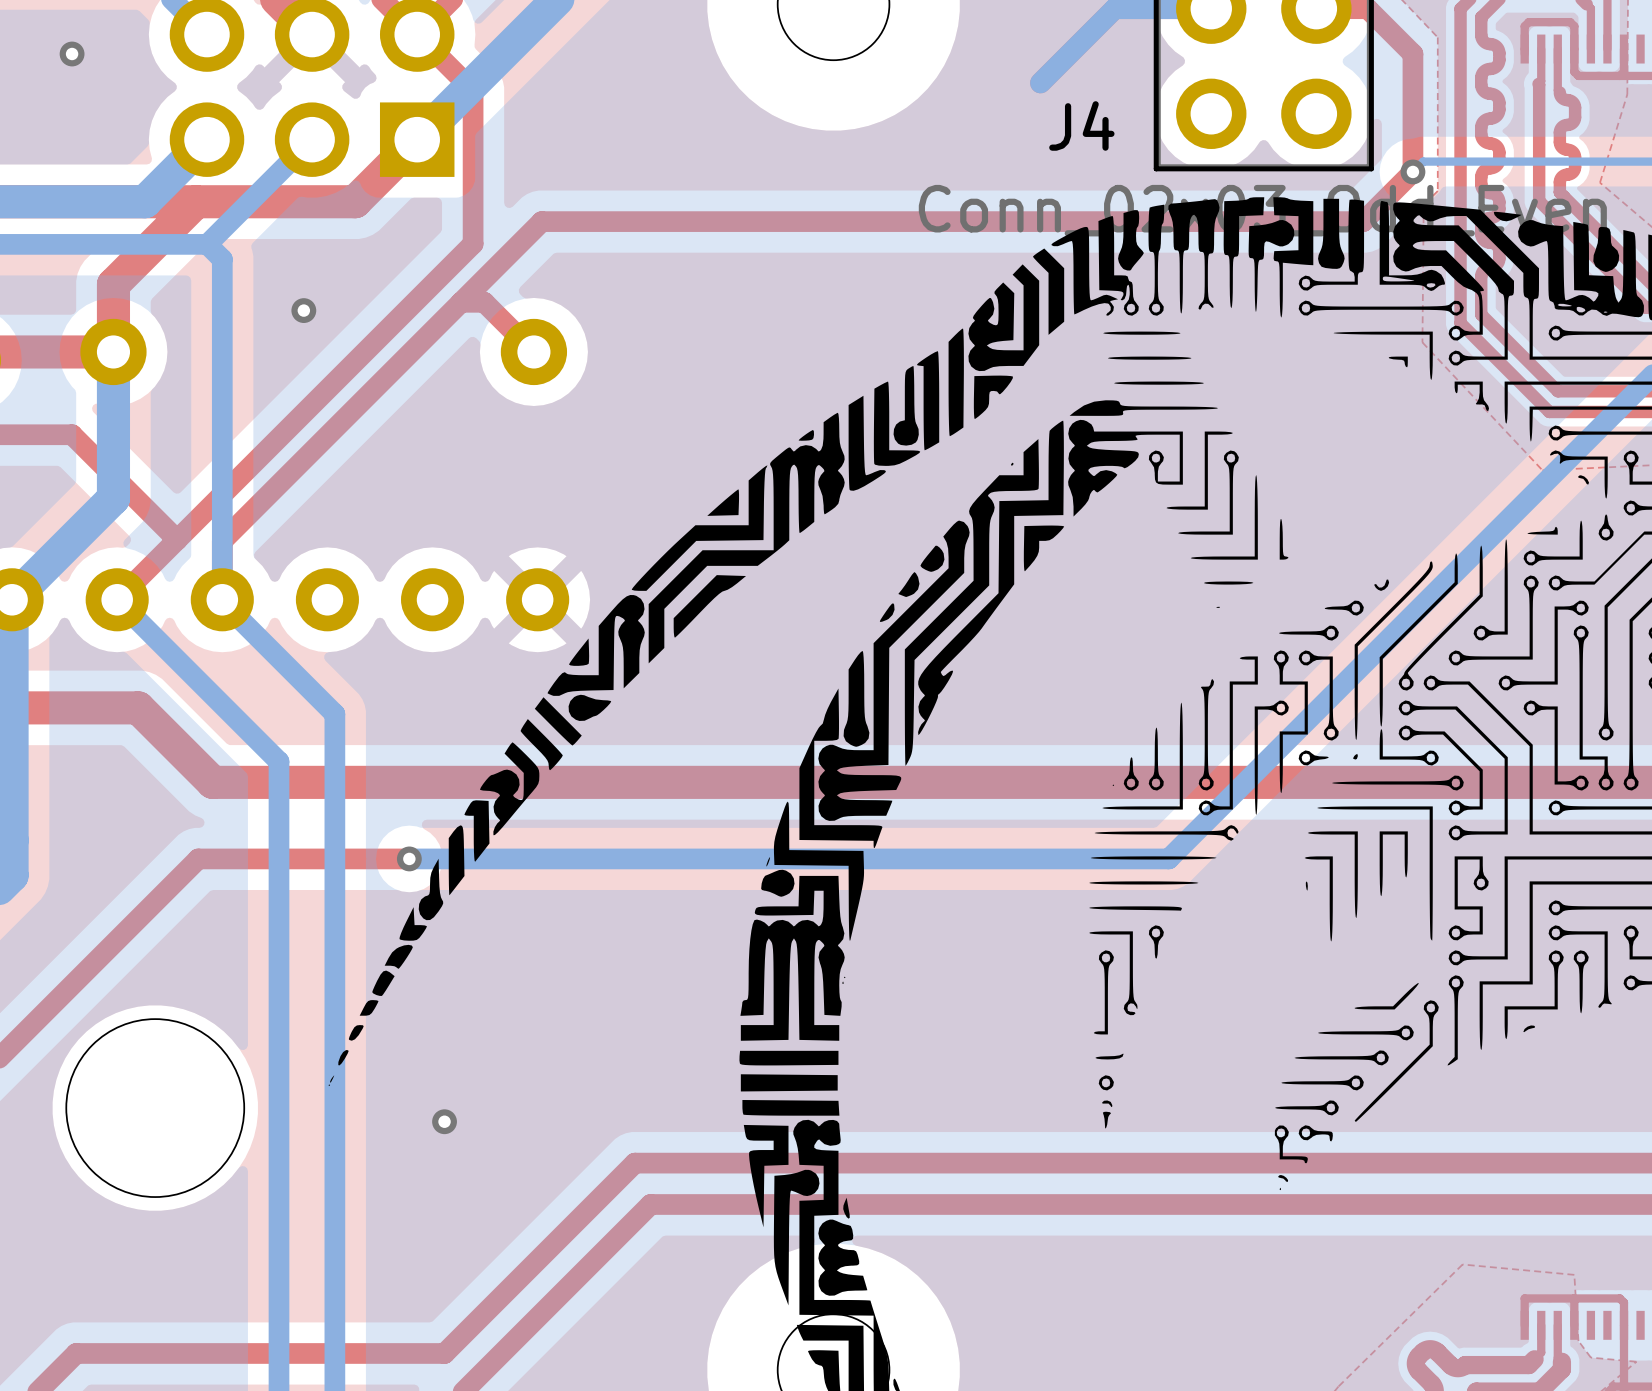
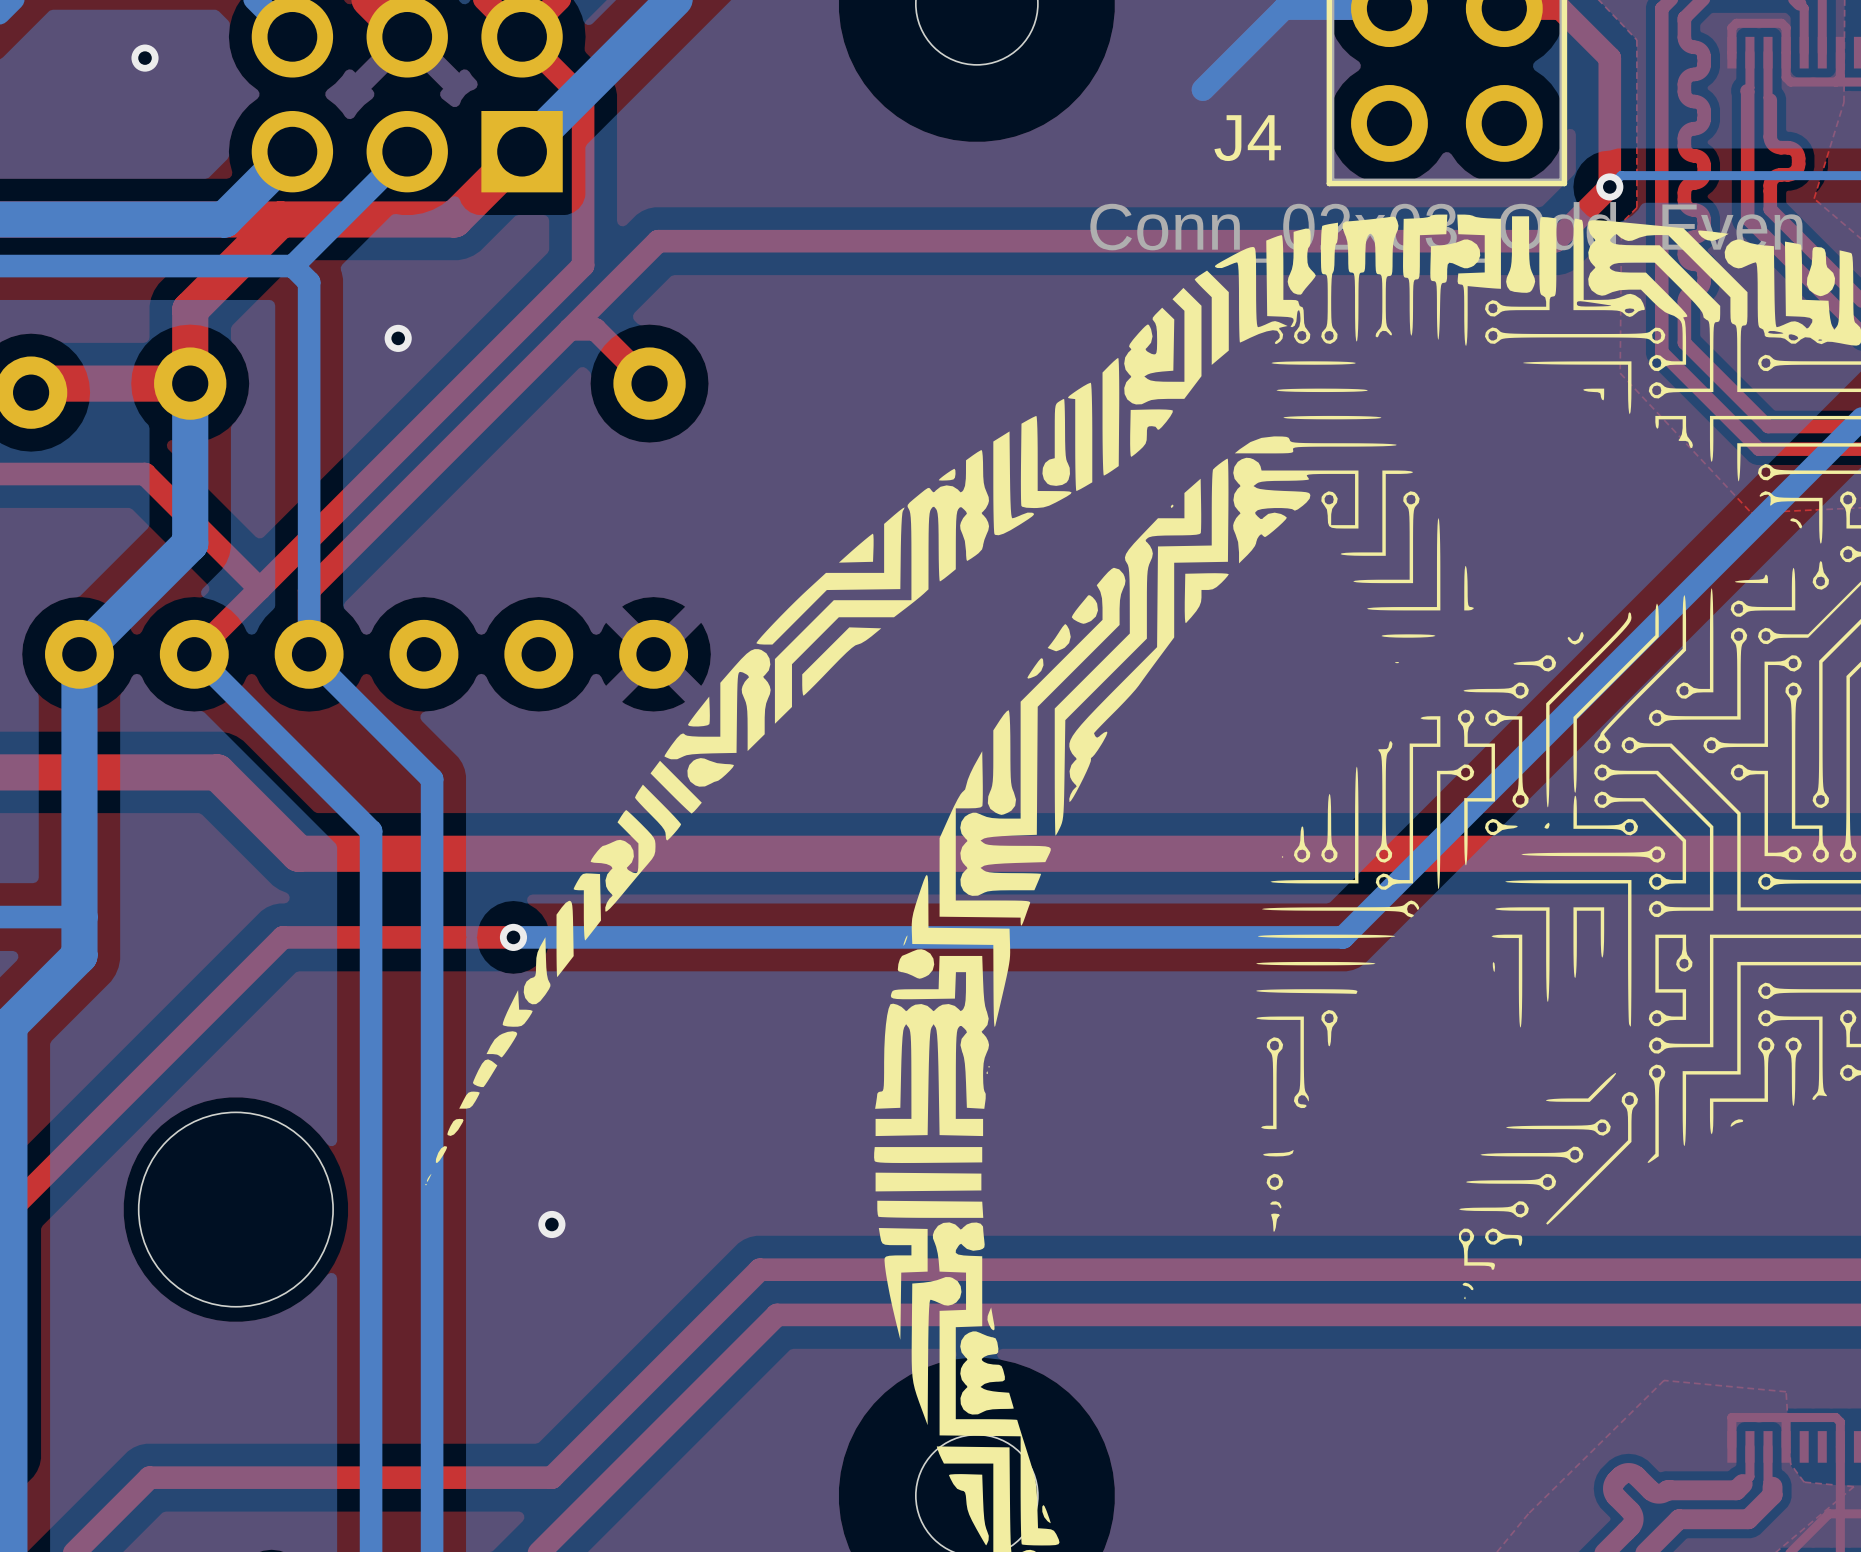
top track: (1559, 92) (1562, 98) (1572, 102) (1575, 107) (1574, 121) (1562, 126) (1559, 132) (1561, 146) (1571, 150) (1574, 154) (1574, 168) (1571, 173) (1562, 176) (1559, 182) -> (1770, 100) (1771, 141) (1777, 147) (1793, 149) (1798, 158) (1797, 167) (1794, 172) (1777, 175) (1772, 178) (1770, 184) (1770, 198)

